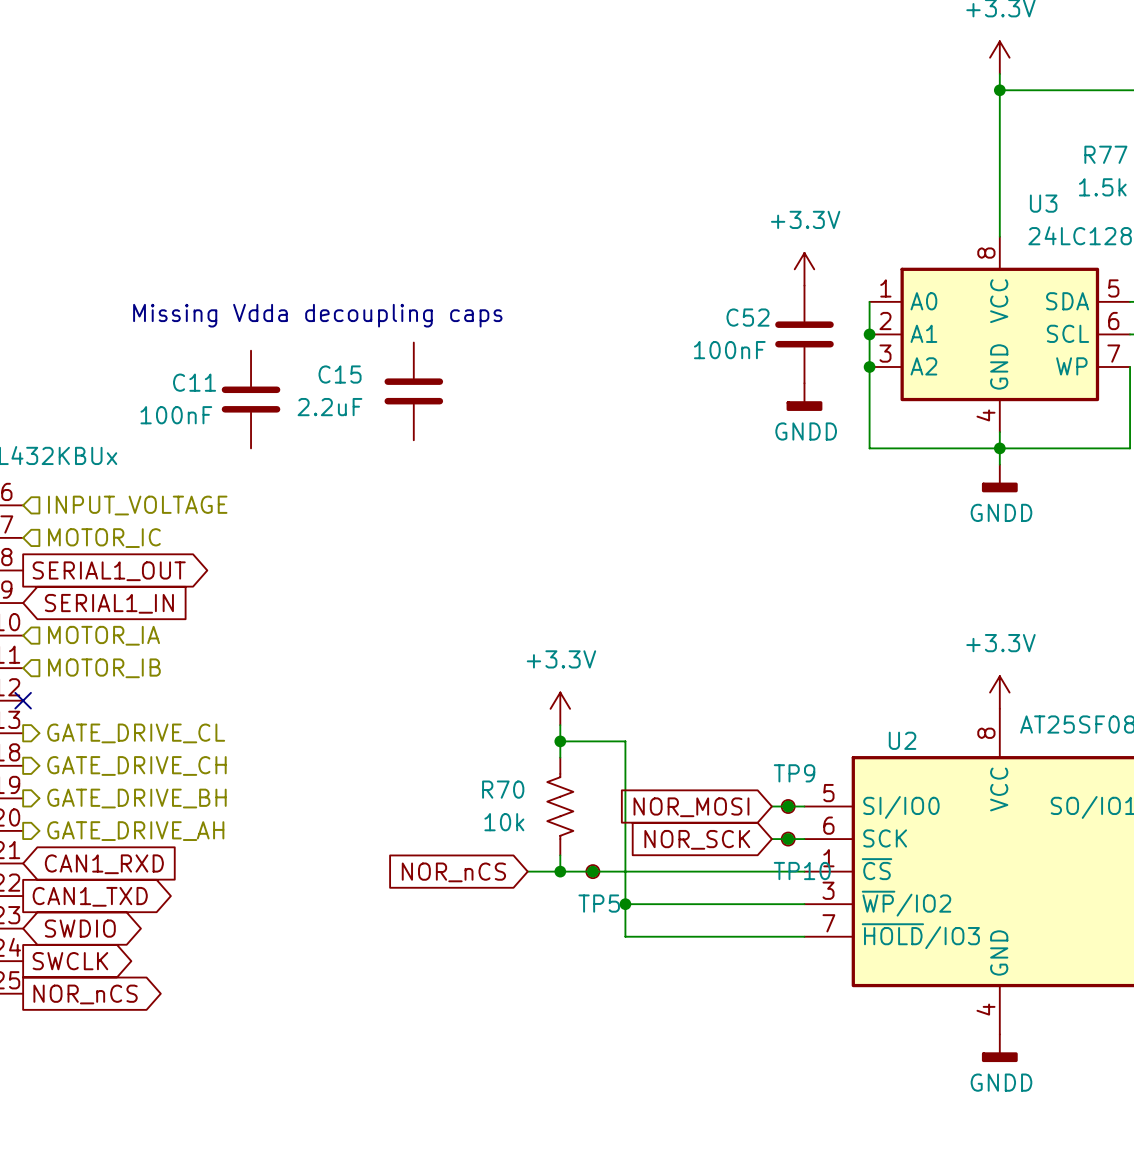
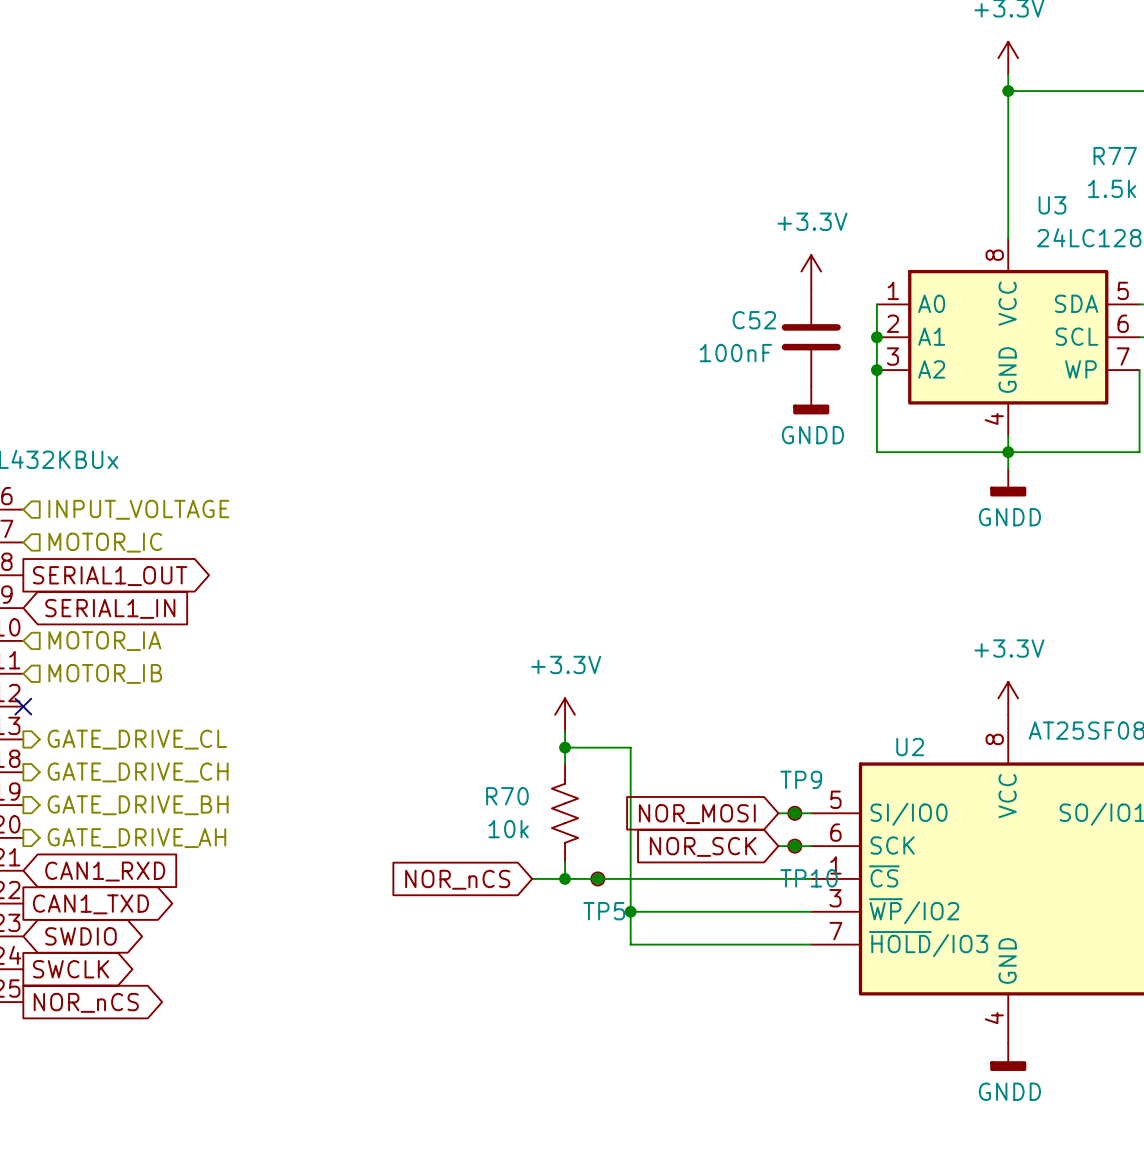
text: Missing Vdda decoupling caps (317, 315) -> none
C15: 2.2uF (413, 391) -> none
C11: 100nF (251, 399) -> none

